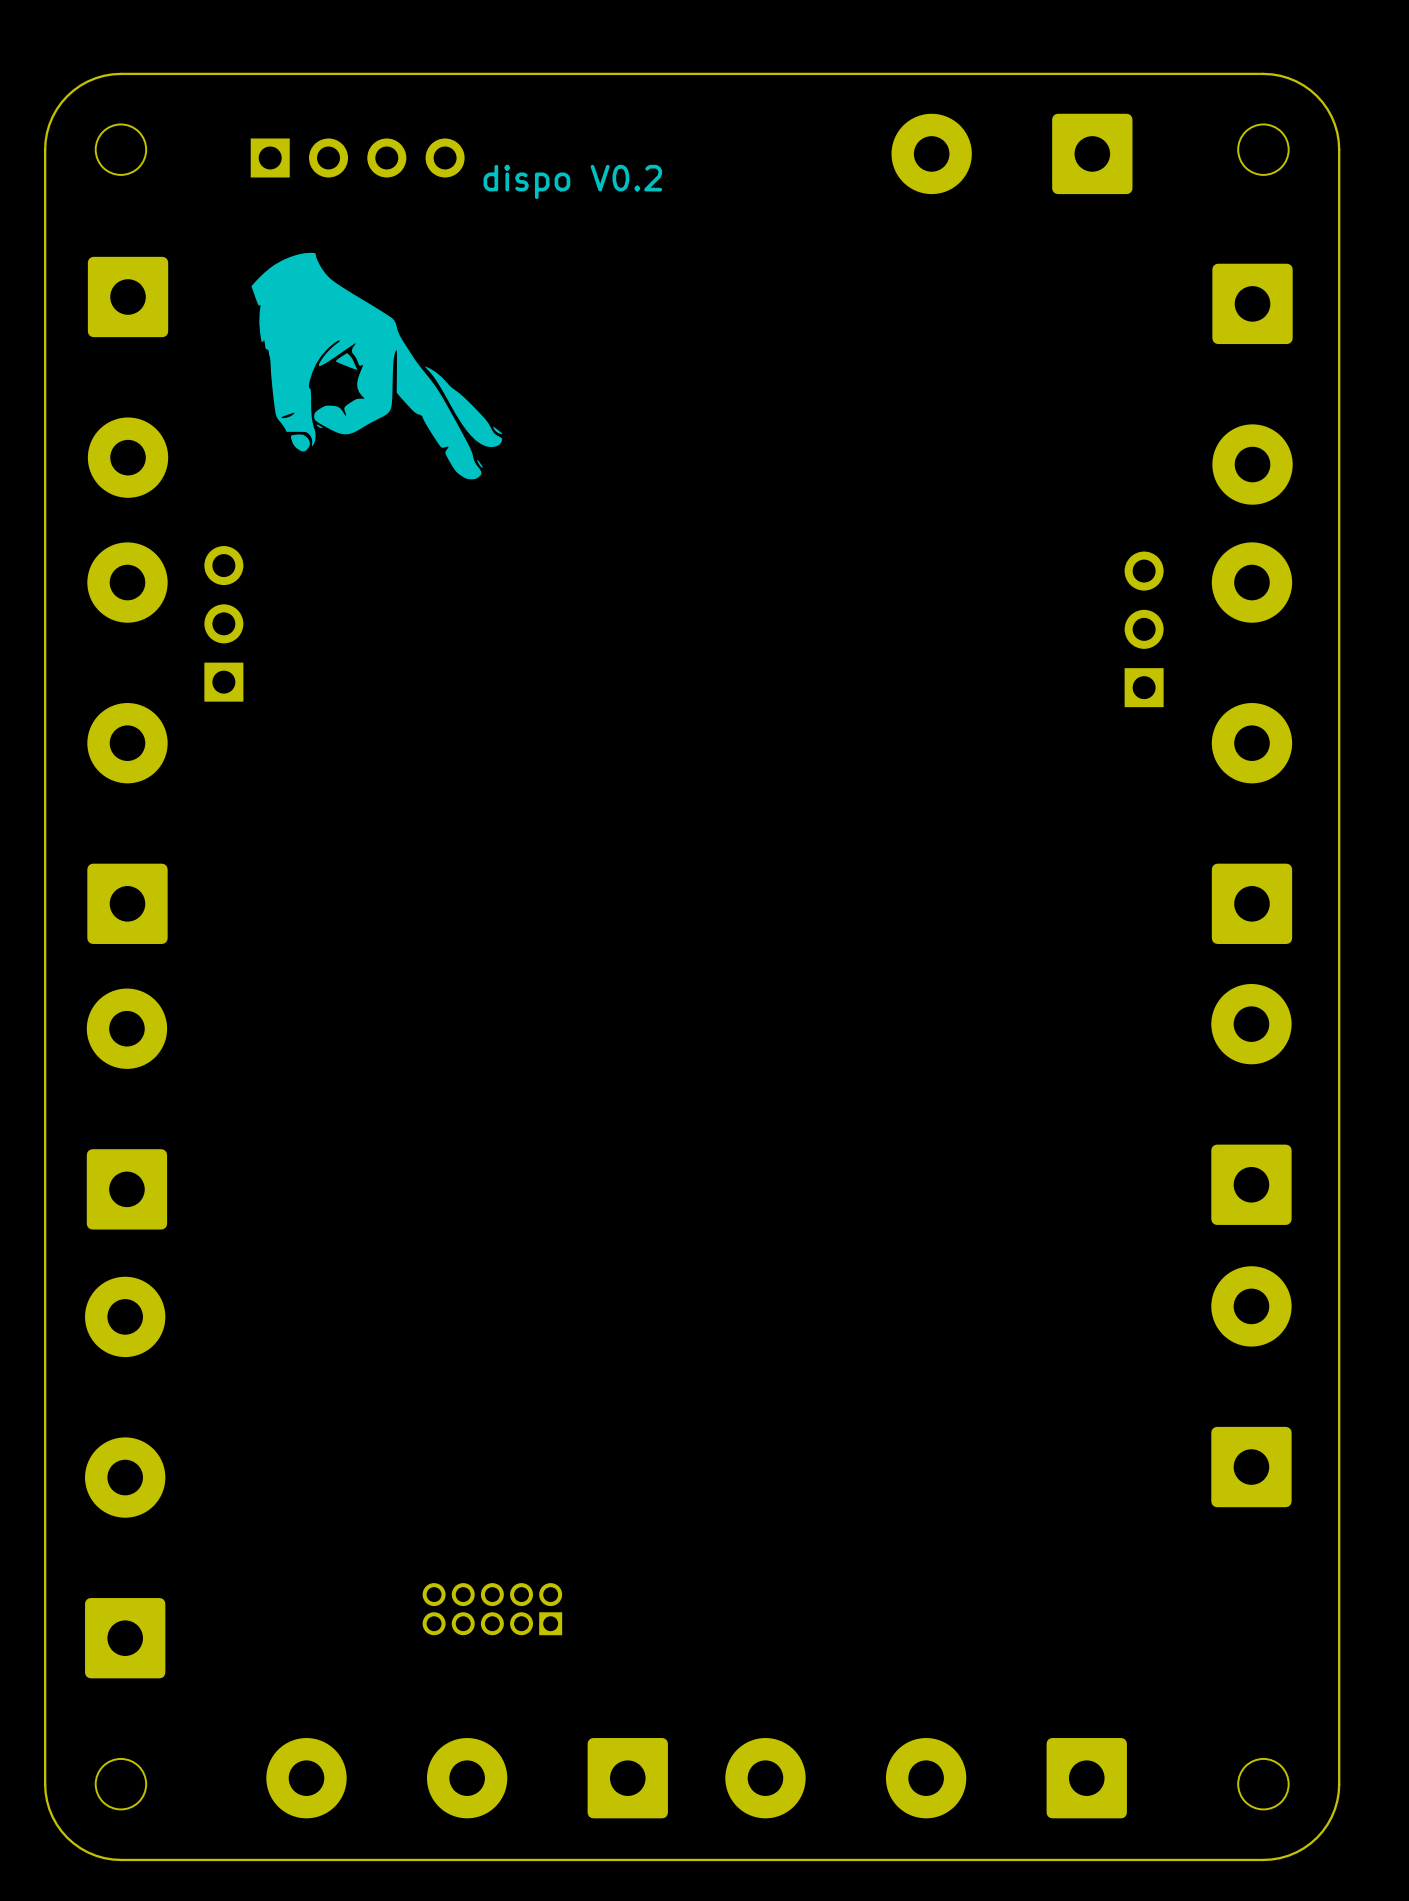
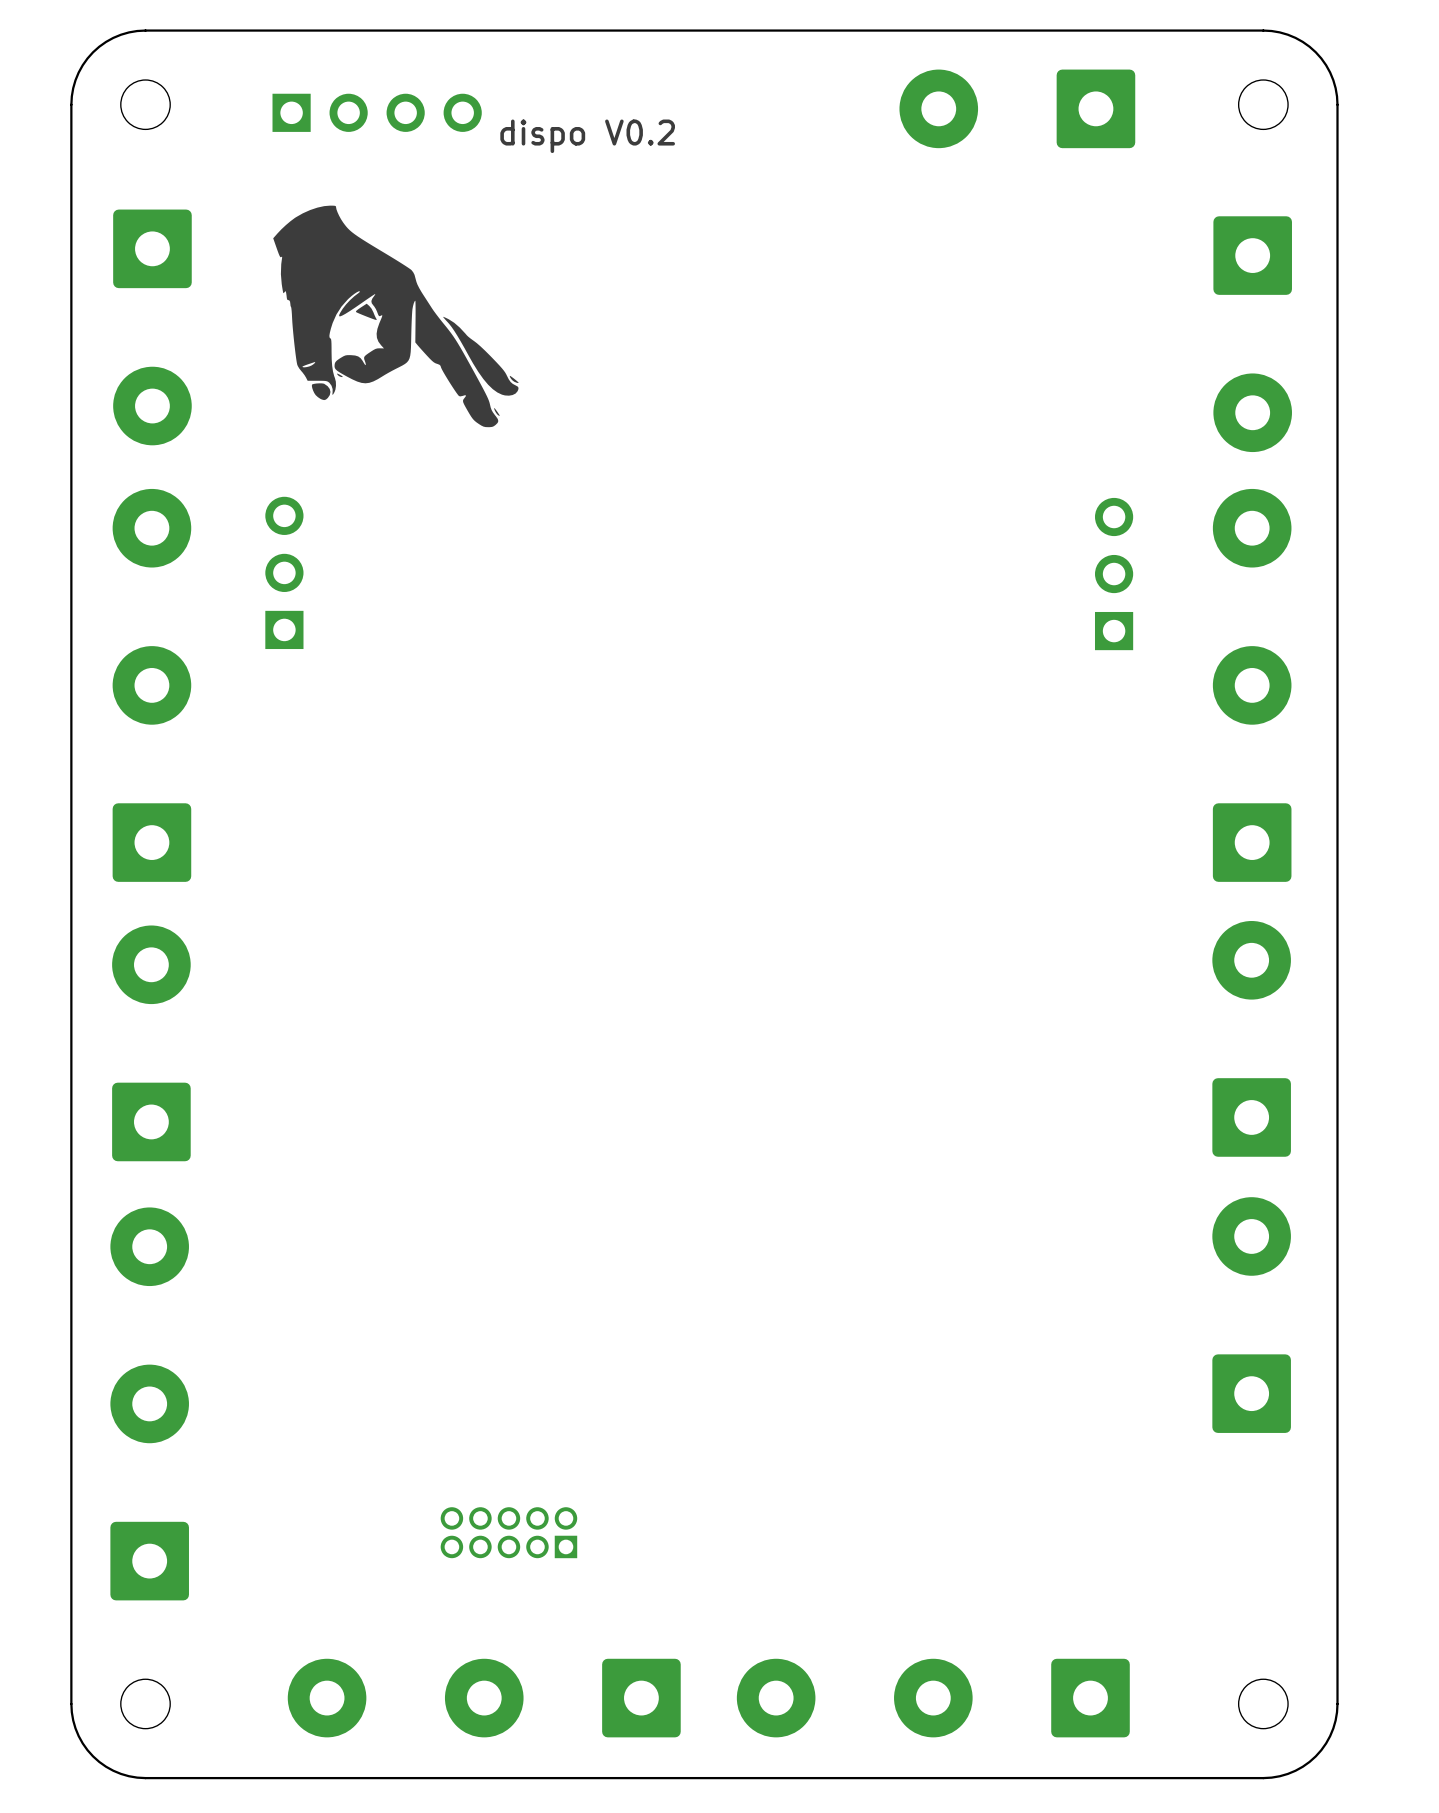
part position: (223, 623) -> (284, 572)
part position: (1144, 629) -> (1114, 574)

